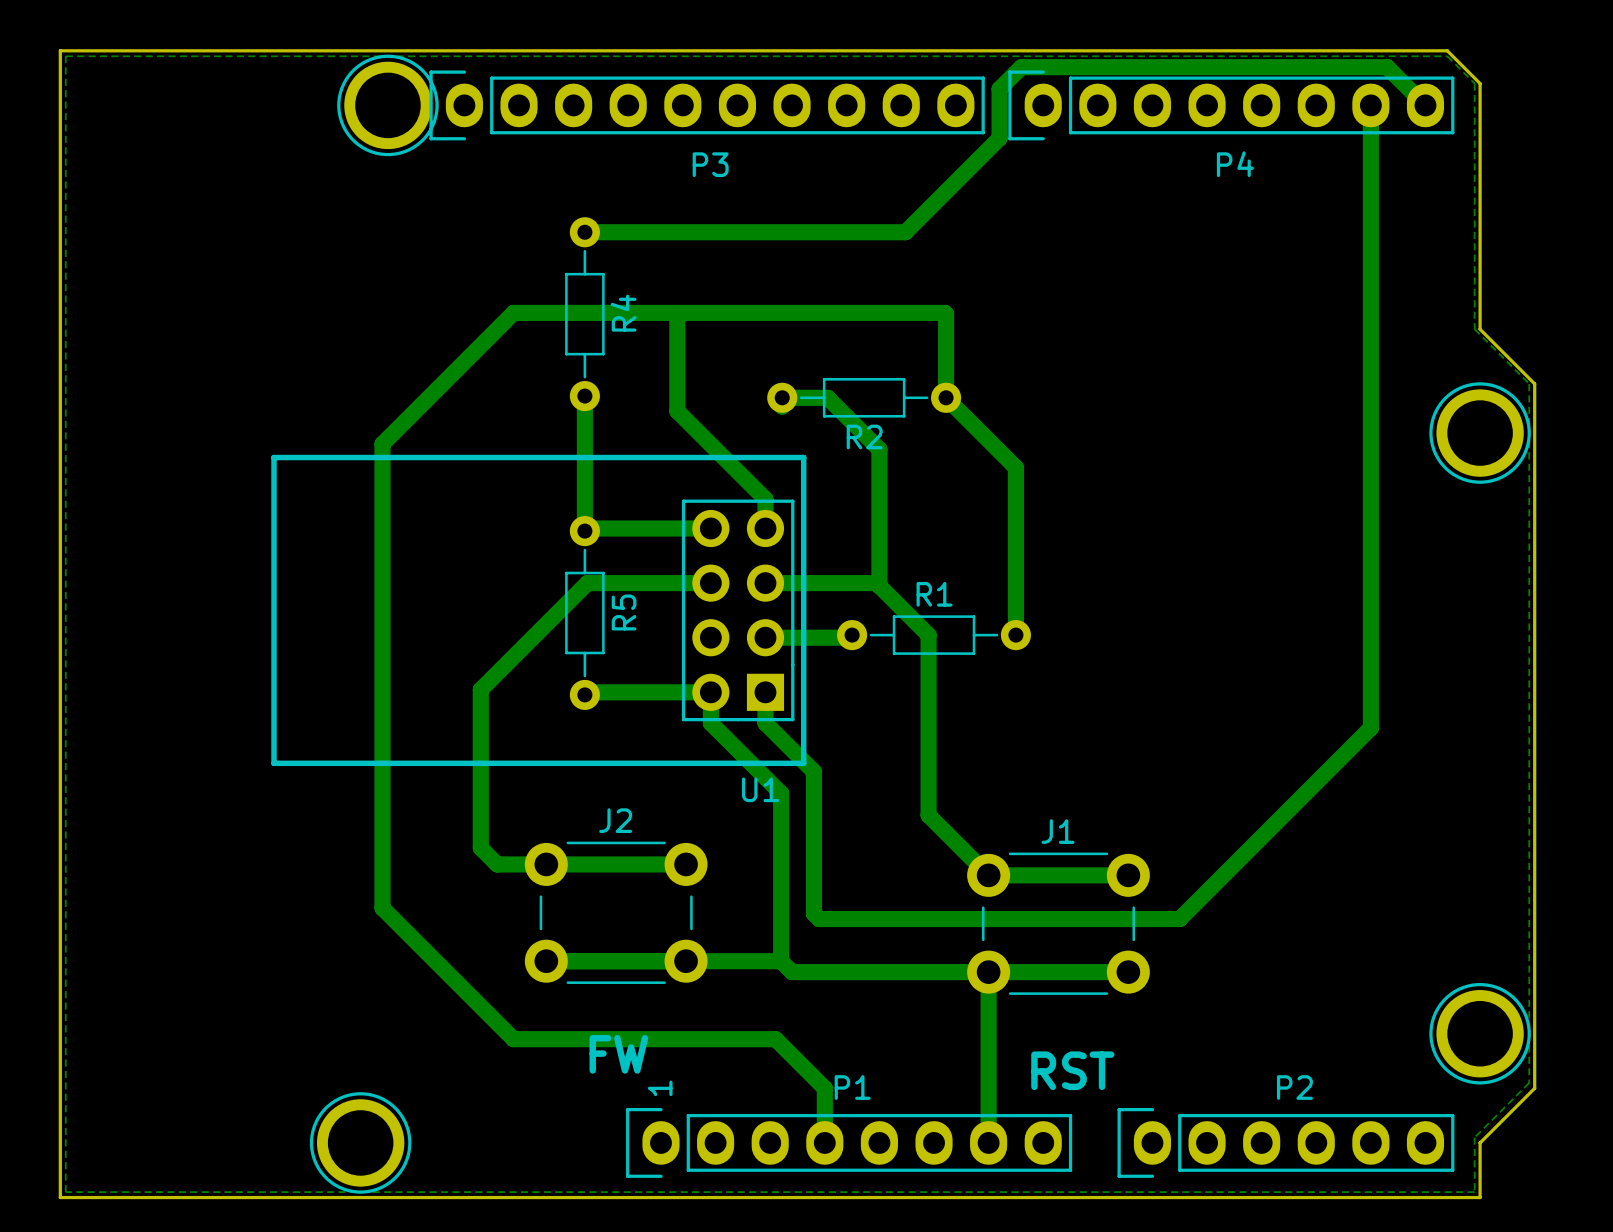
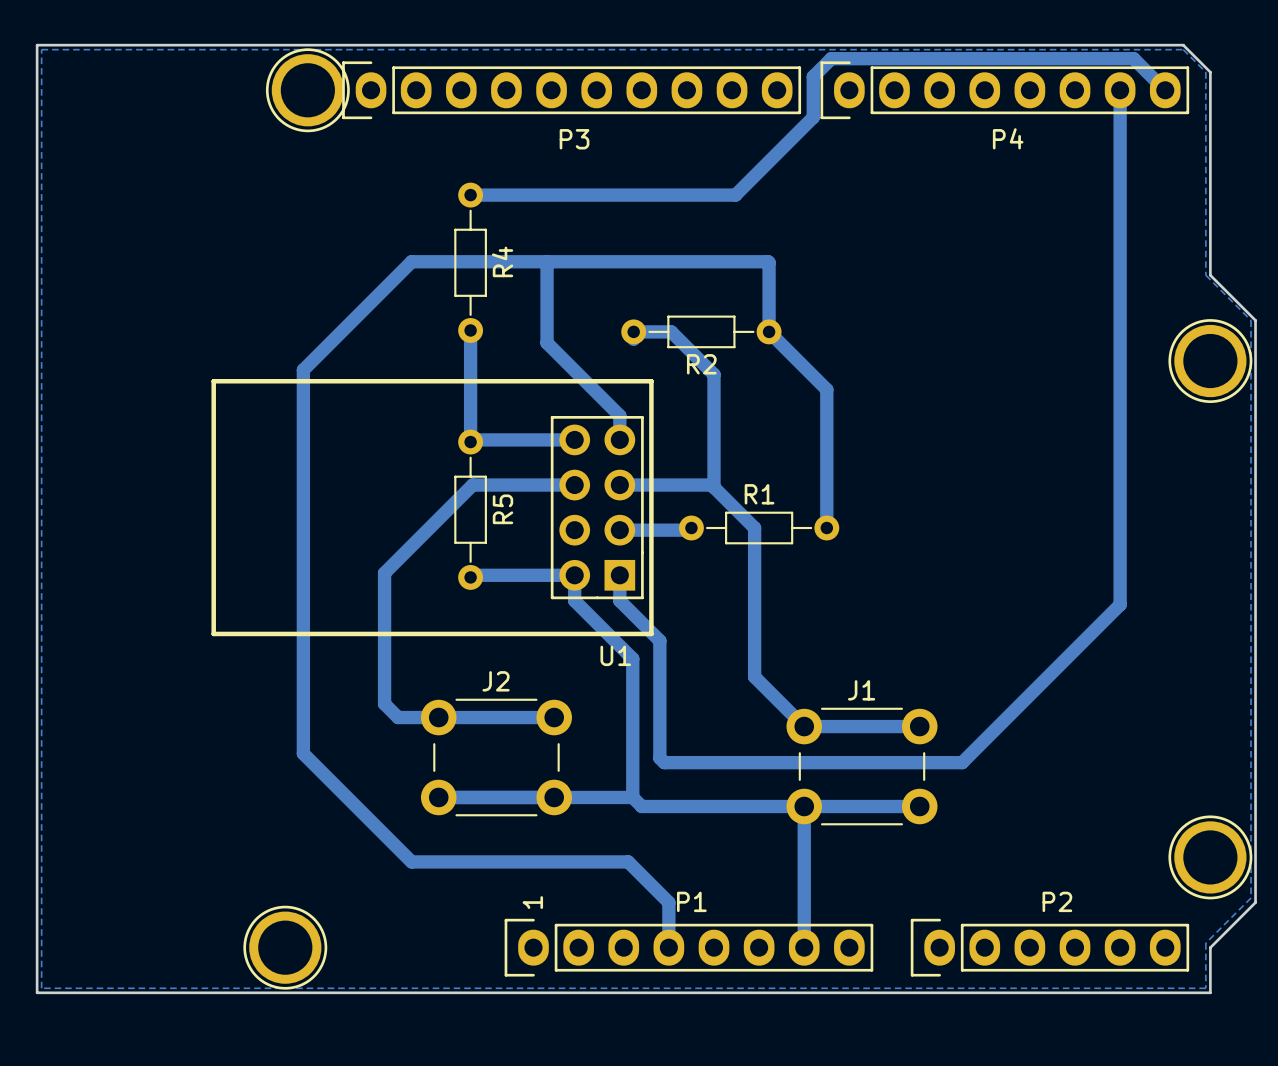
text: FW (618, 1054) -> none
text: RST (1072, 1070) -> none

